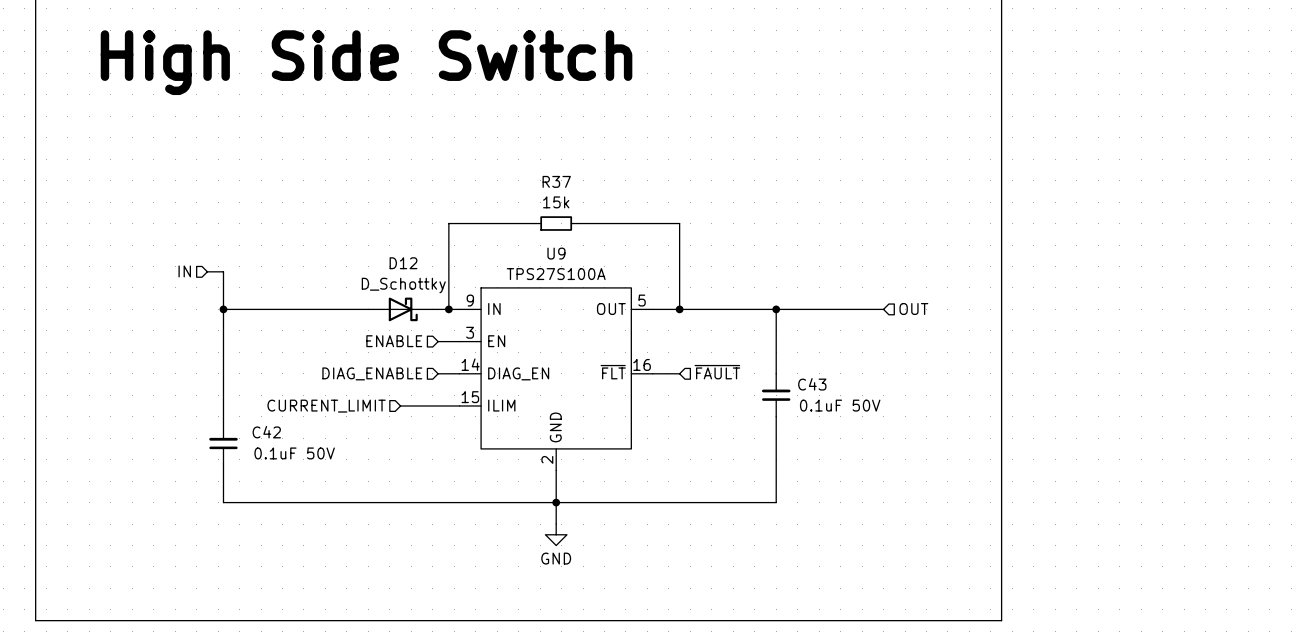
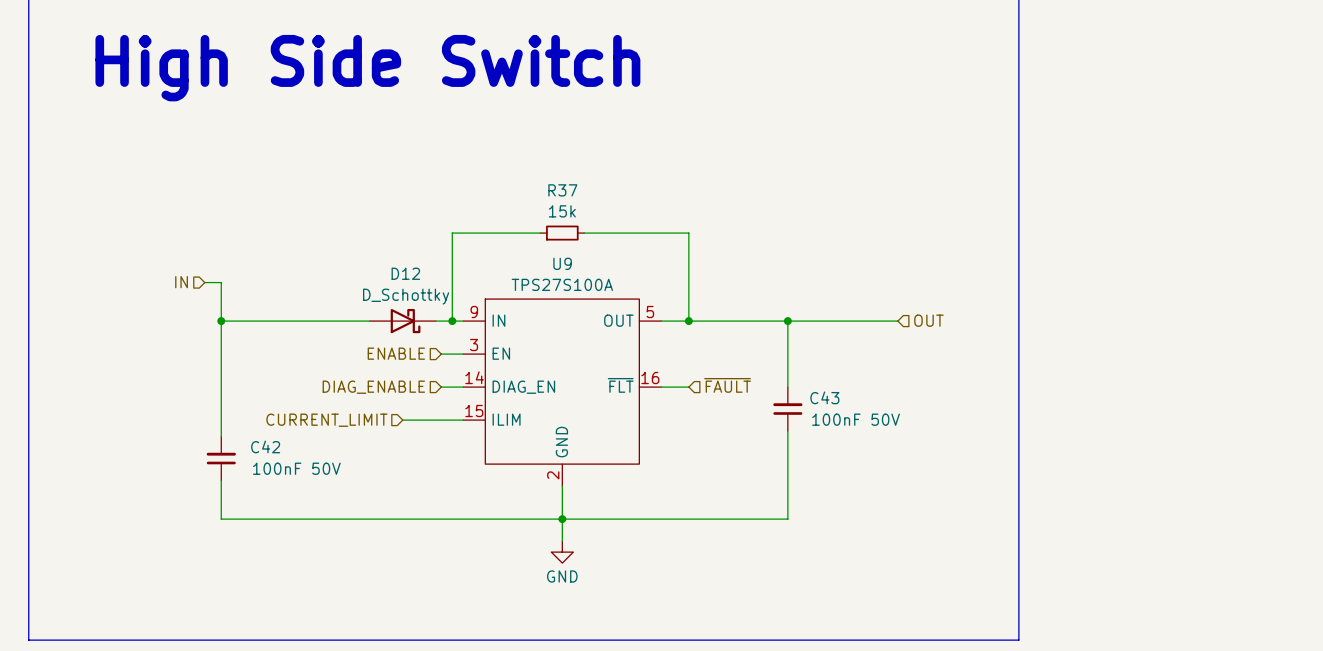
C43 value: 0.1uF 50V (840, 405) -> 100nF 50V (856, 419)
C42 value: 0.1uF 50V (294, 453) -> 100nF 50V (296, 468)

